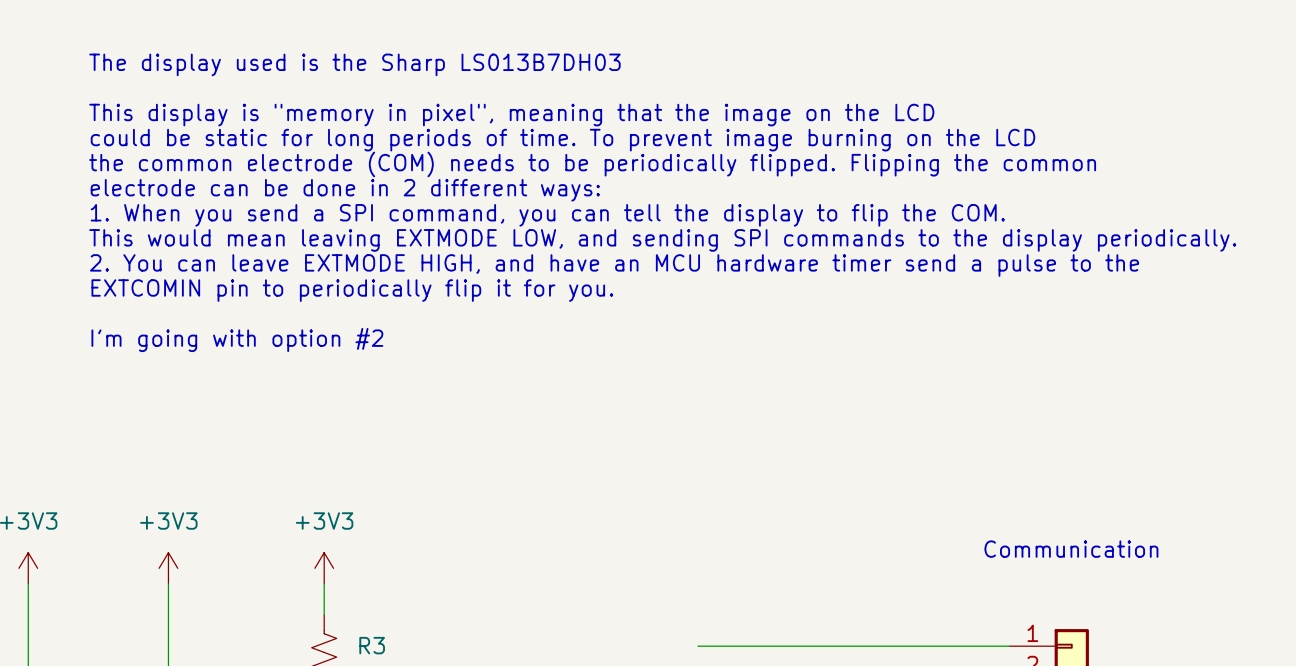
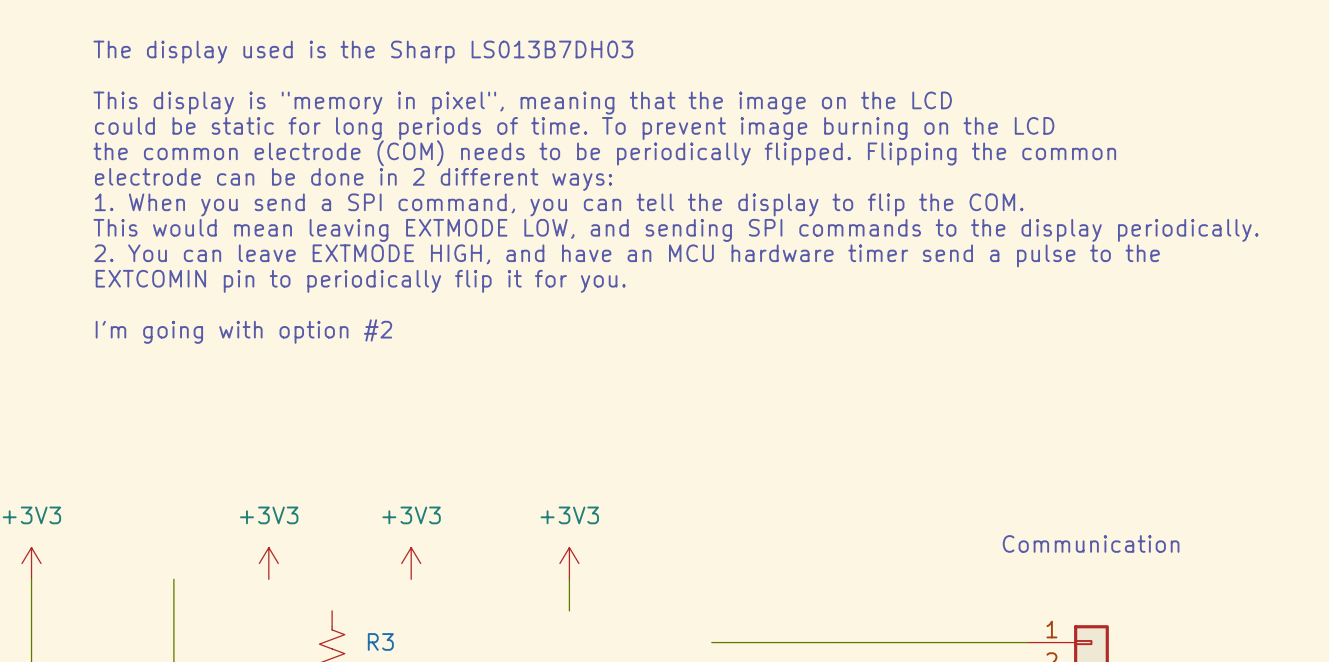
power symbol: +3V3 (168, 568) -> none
power symbol: none -> +3V3 (268, 563)
power symbol: +3V3 (324, 568) -> none
power symbol: none -> +3V3 (411, 563)
power symbol: none -> +3V3 (569, 563)
wire: (324, 583) (324, 615) -> (569, 579) (569, 610)

